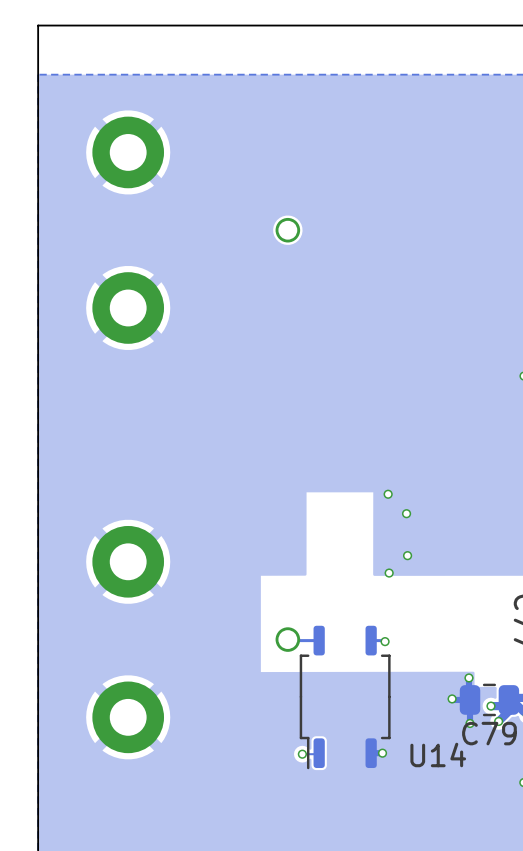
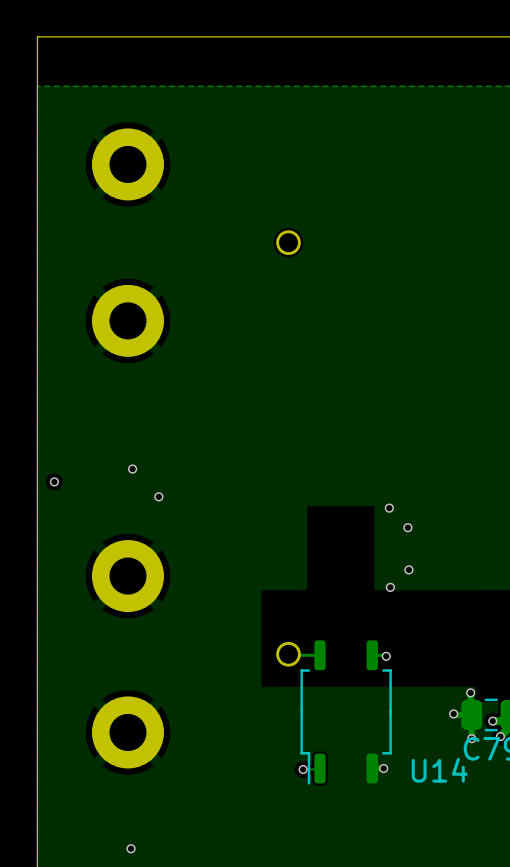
via: none -> (132, 469)
via: none -> (54, 481)
via: none -> (158, 496)
via: none -> (131, 848)

